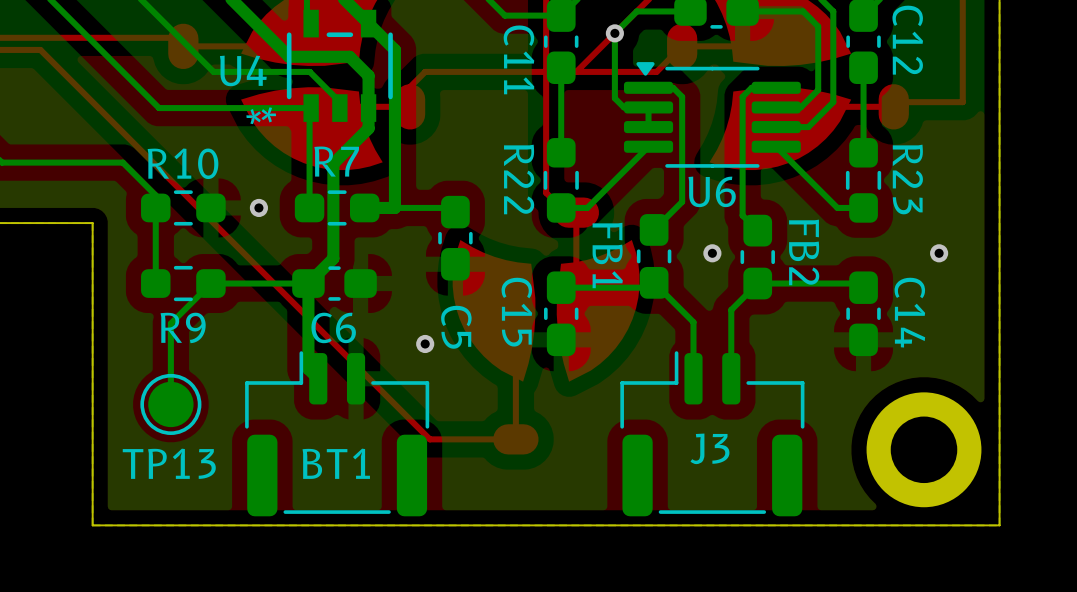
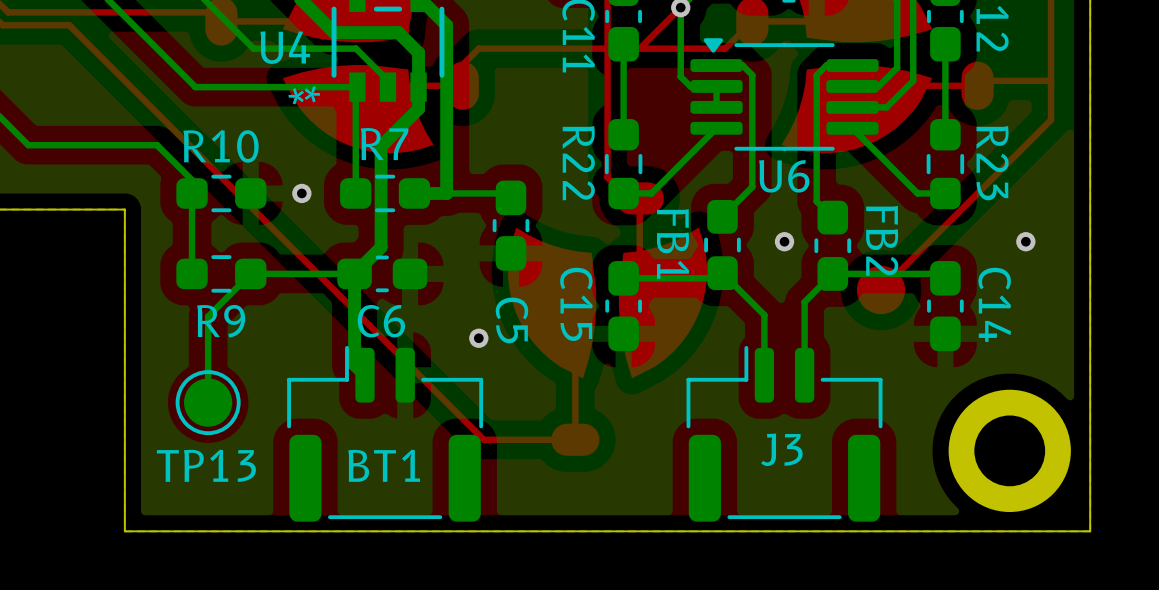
top track: none -> (1051, 80) (1051, 120) (881, 289)
part: none -> (881, 289)

